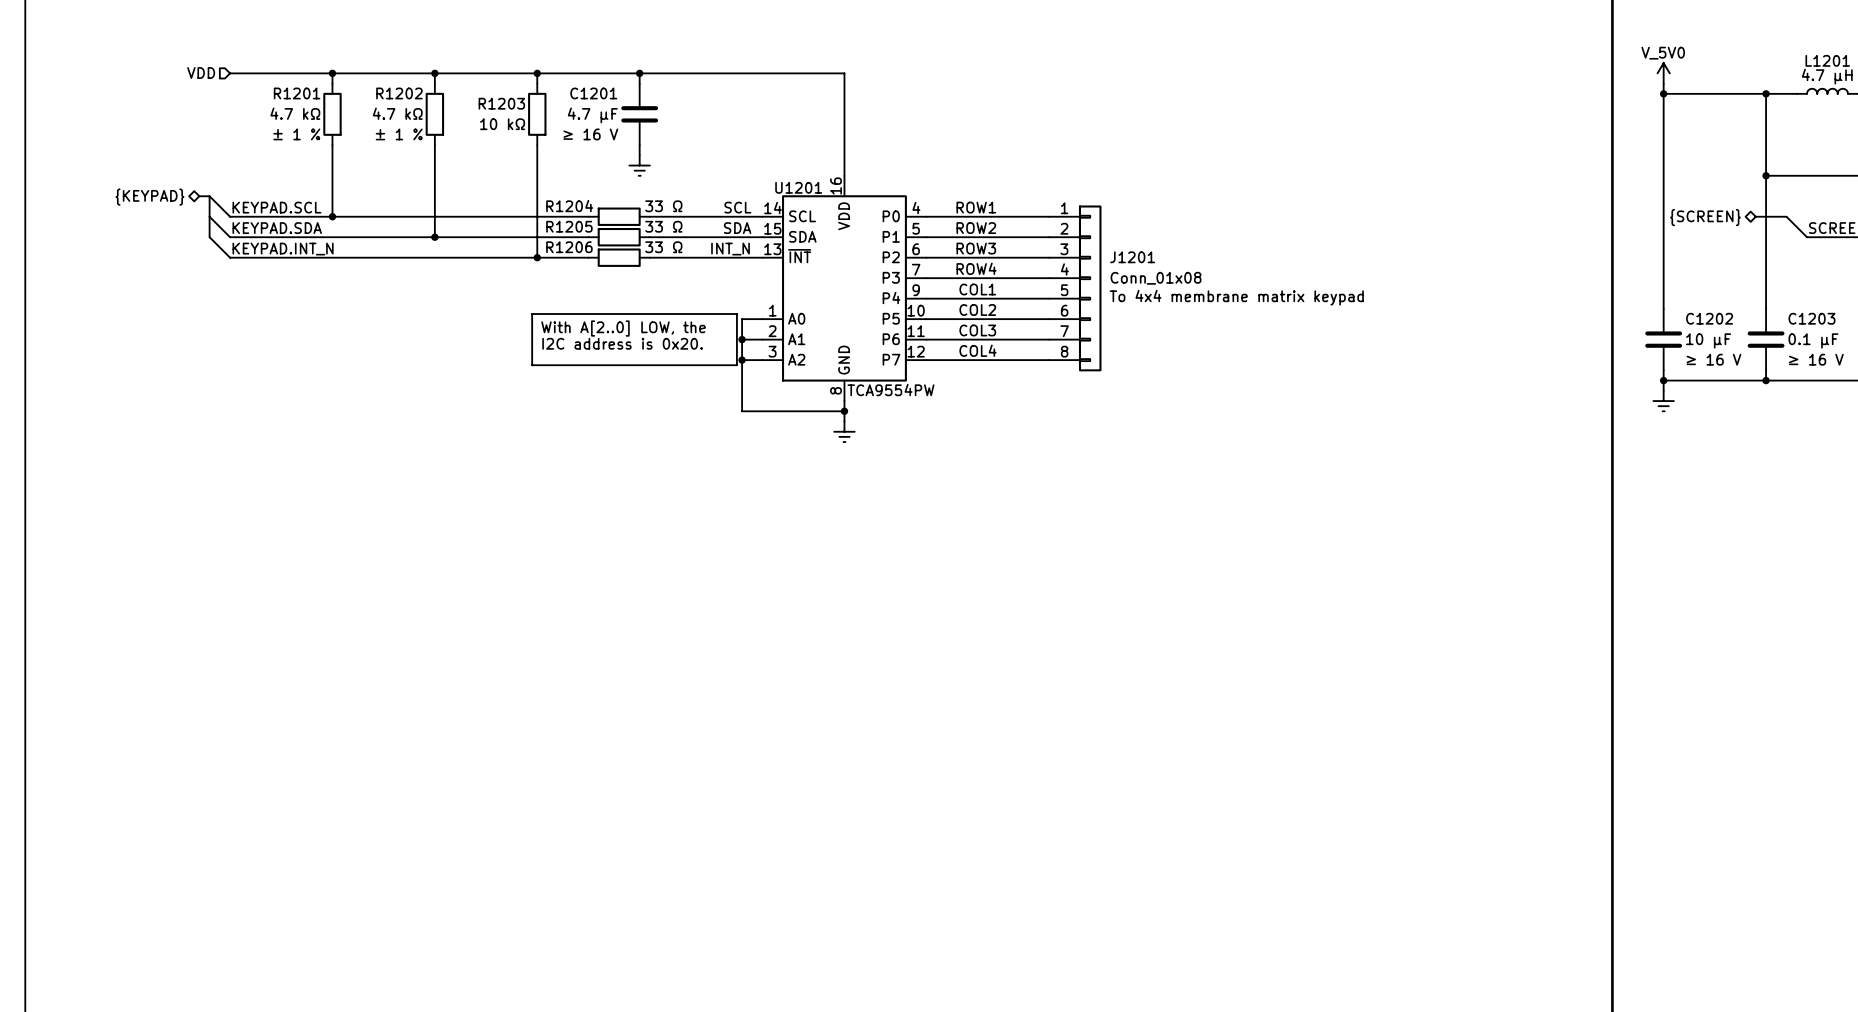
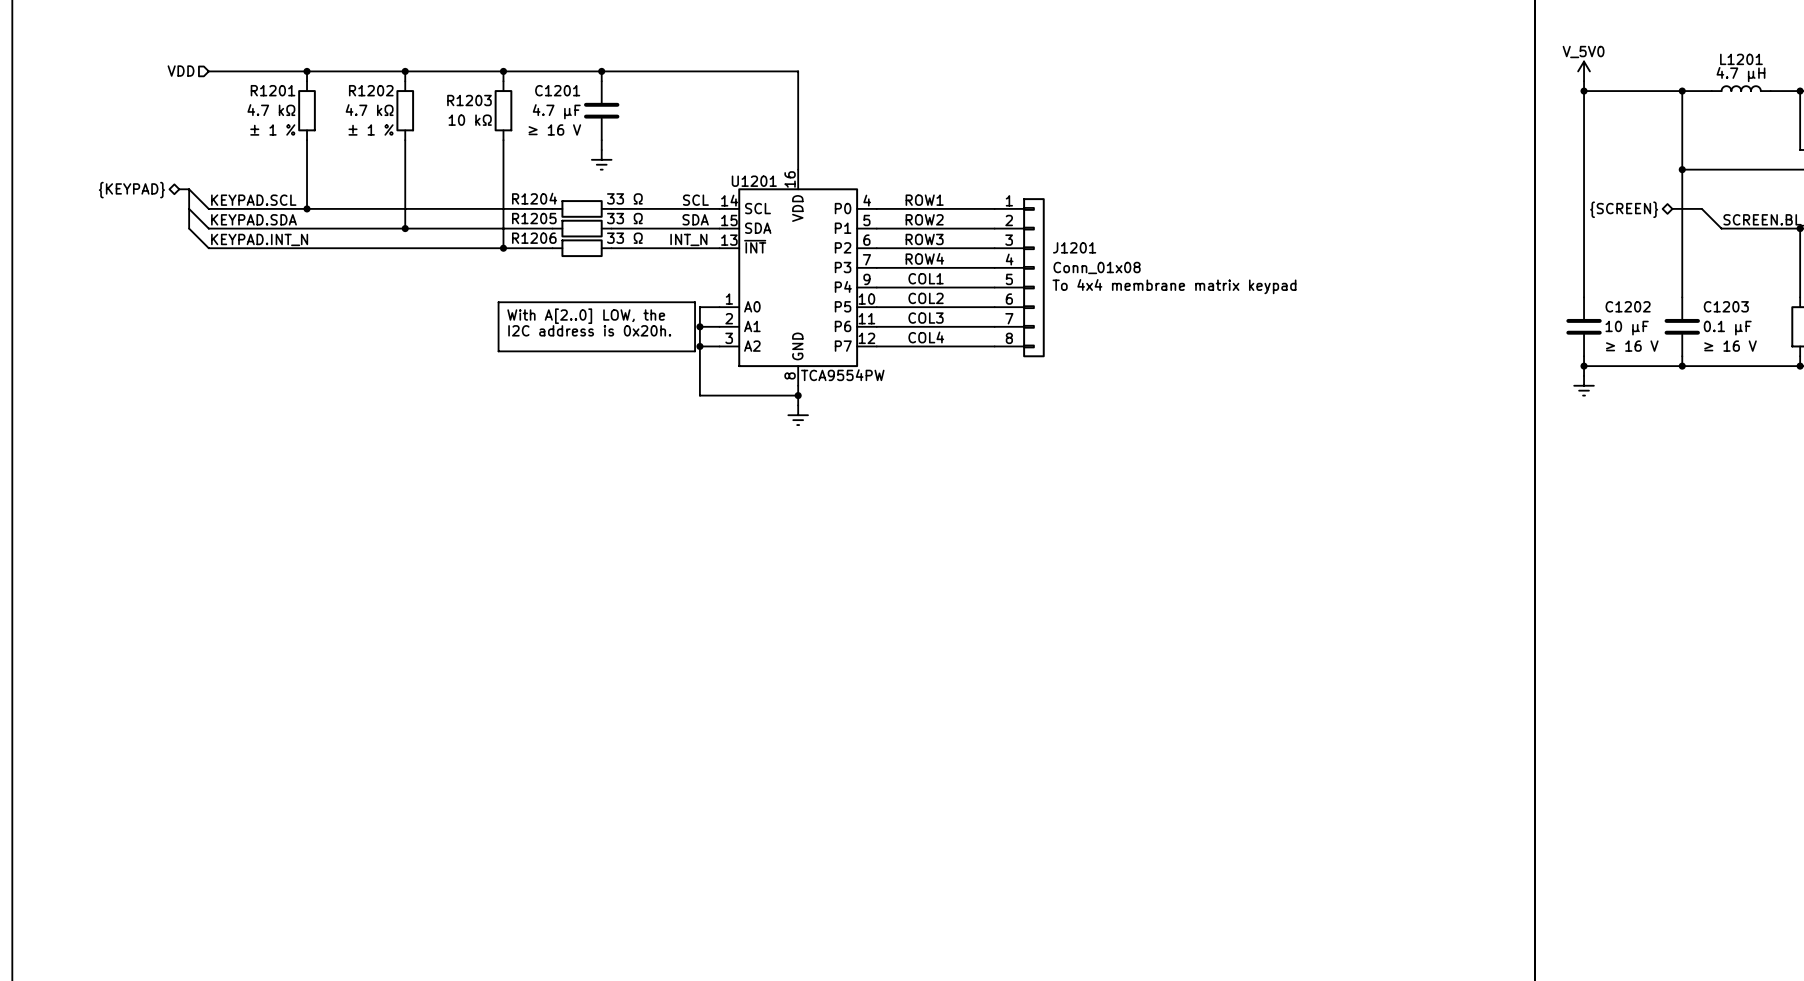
text: I2C address is 0x20. (622, 343) -> I2C address is 0x20h. (589, 330)

